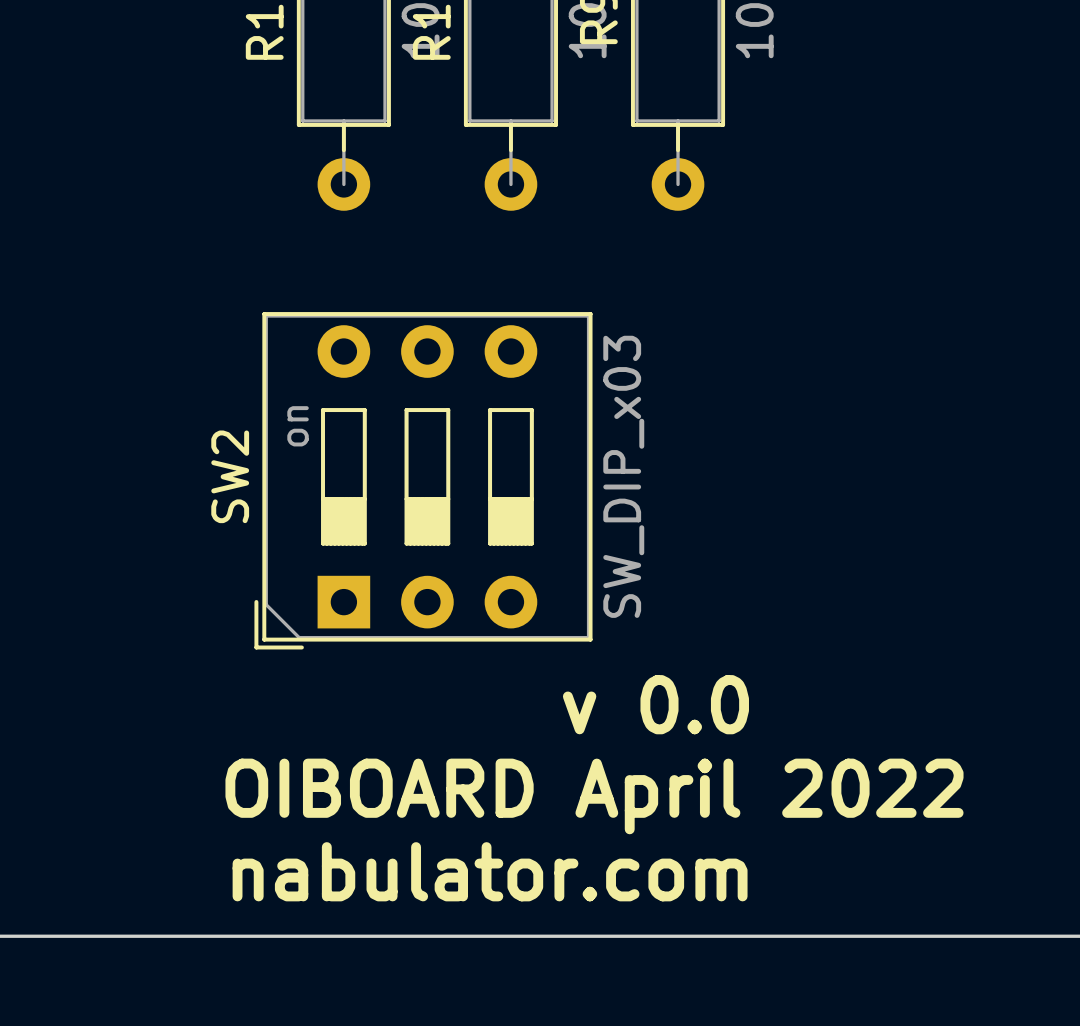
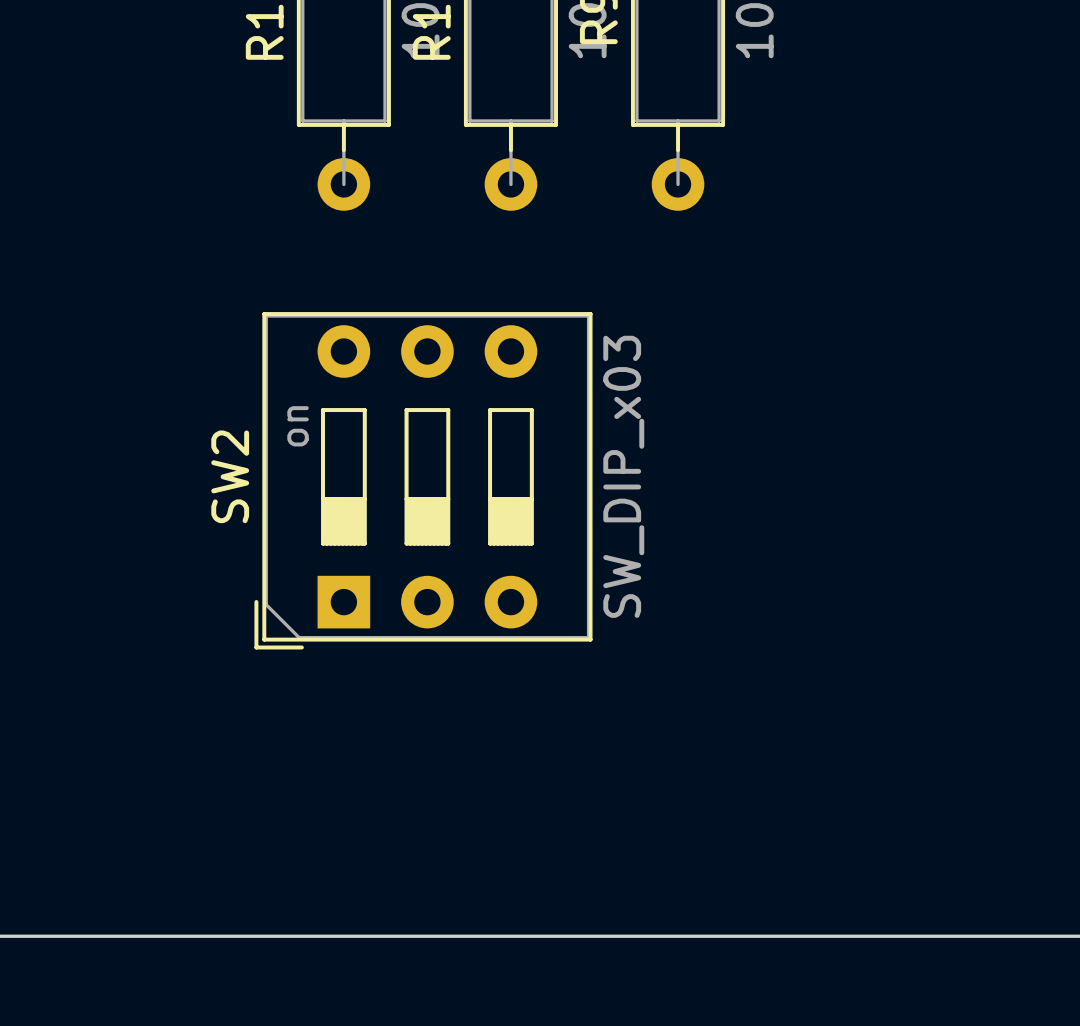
text: v 0.0 (655, 704) -> none
text: OIBOARD April 2022 (594, 796) -> none
text: nabulator.com (490, 871) -> none

